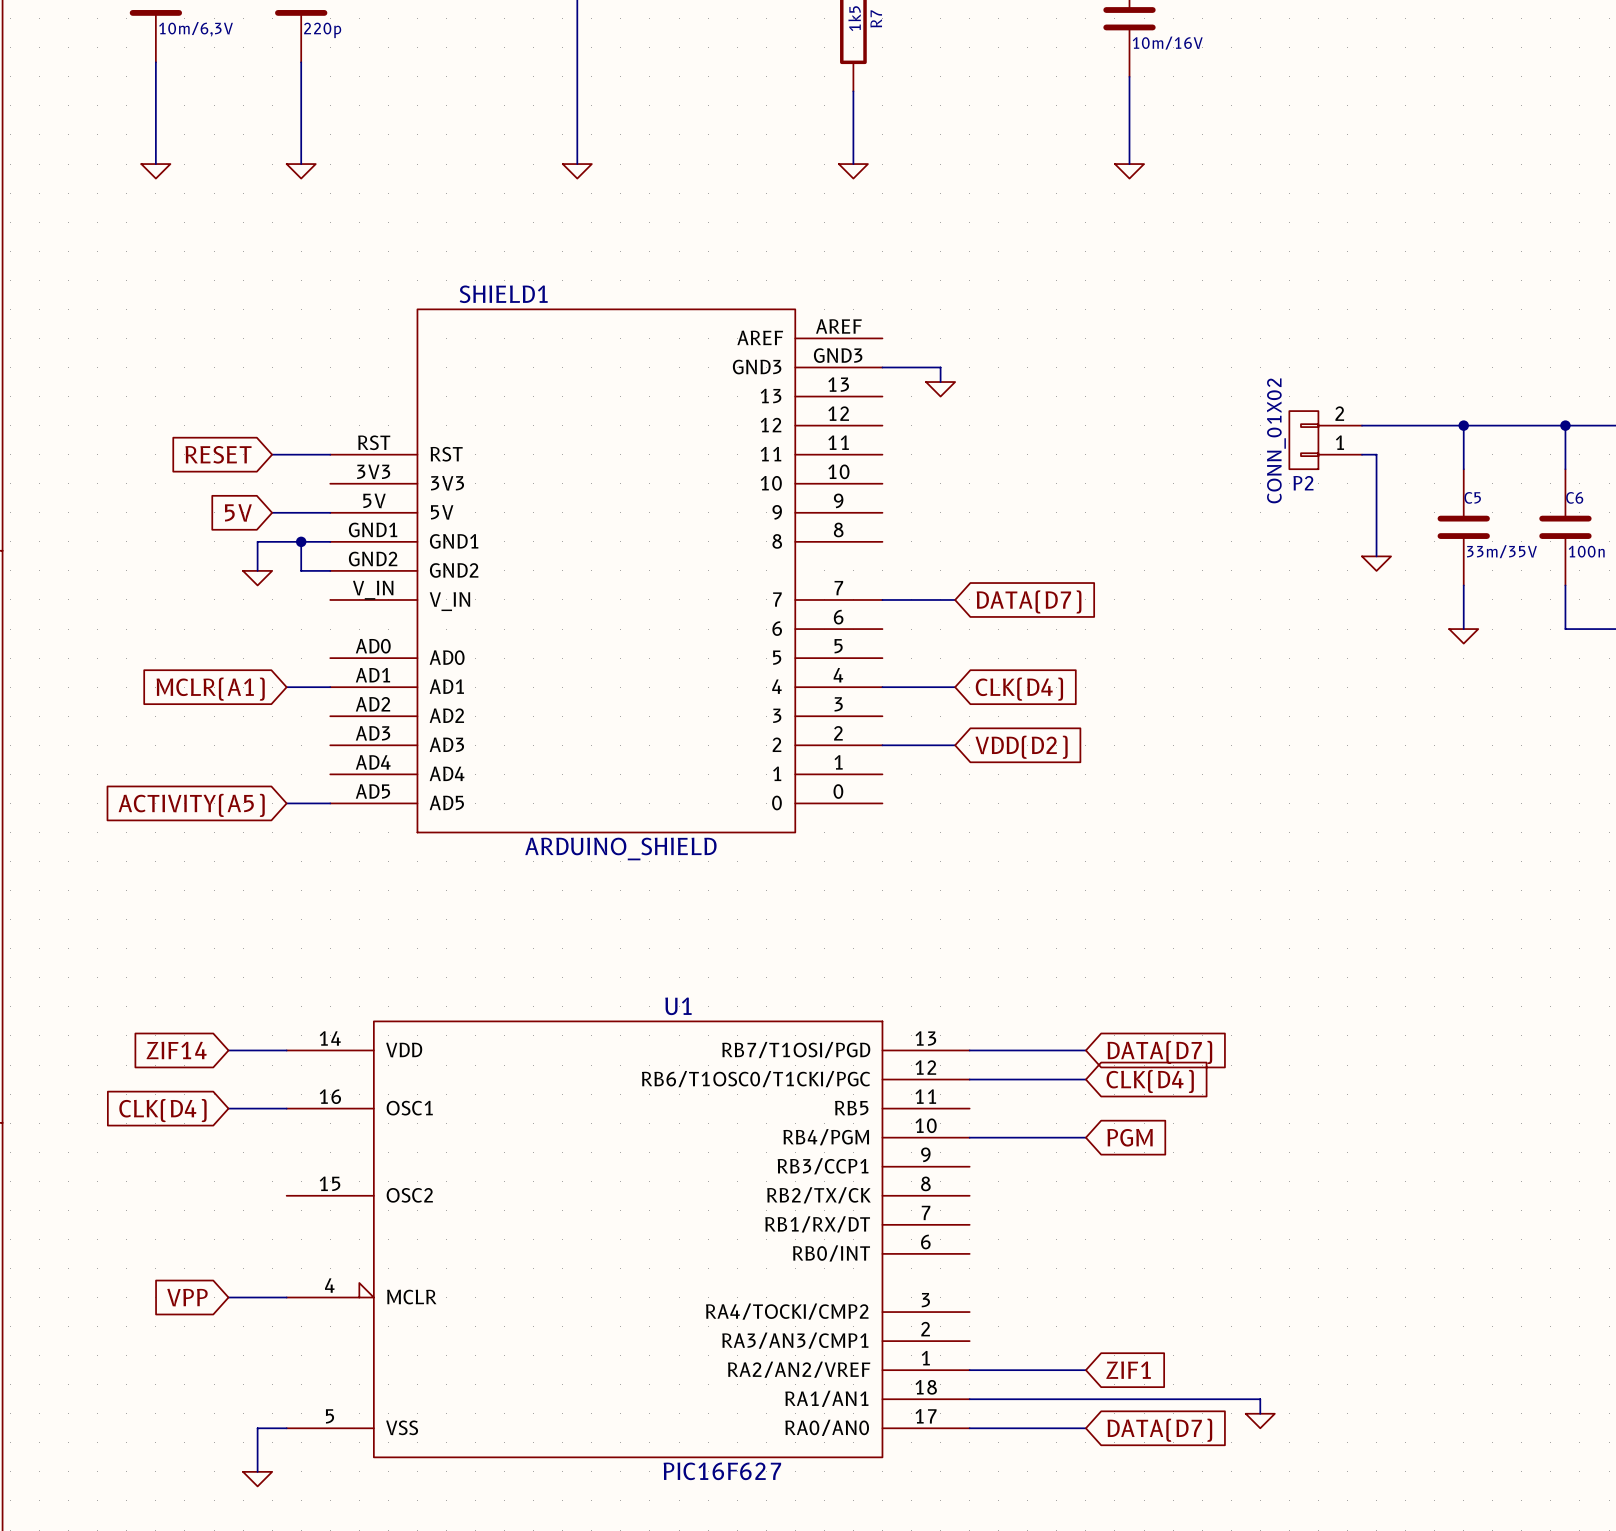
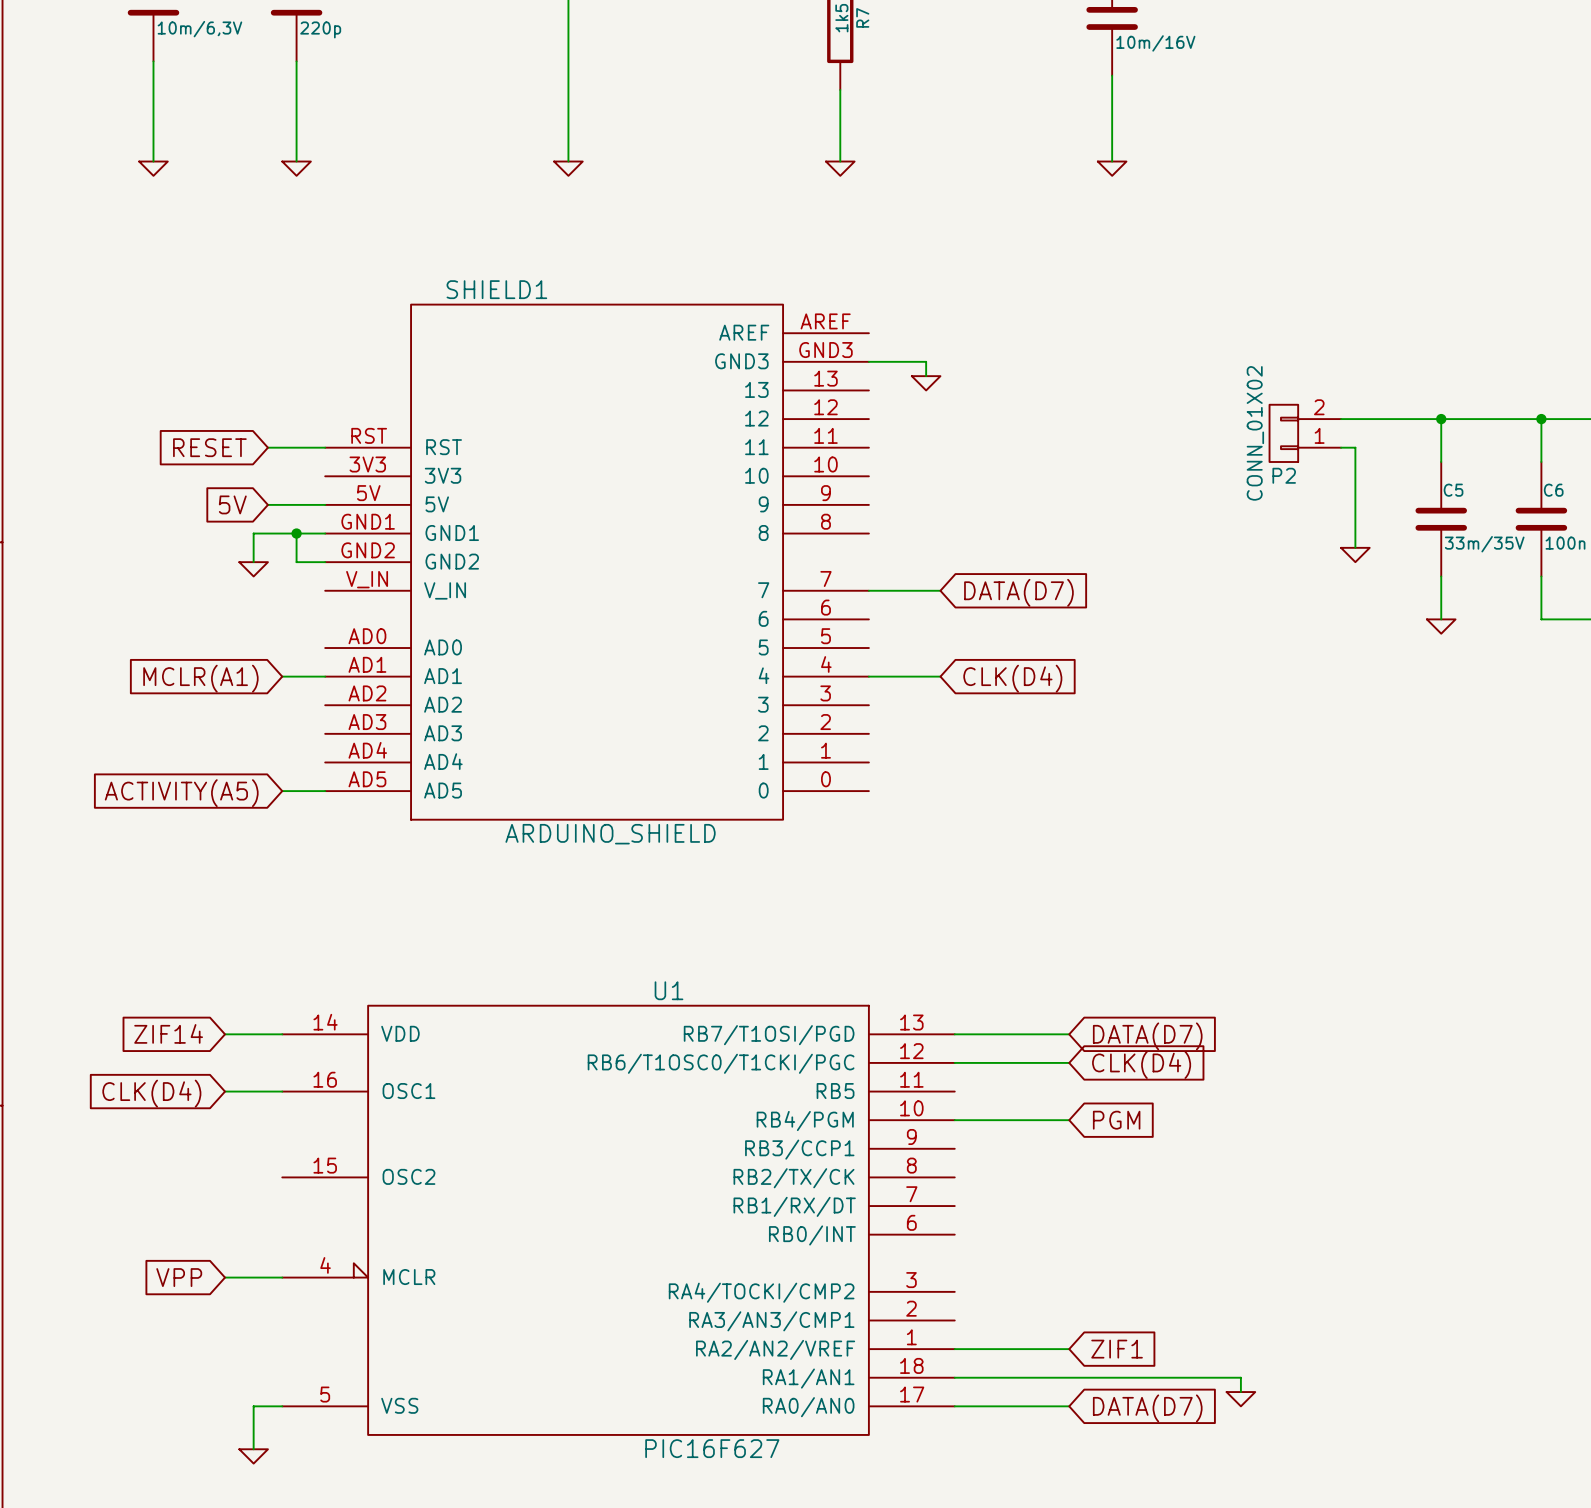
wire: (882, 745) (955, 745) -> none
global label: VDD(D2) (1021, 747) -> none

